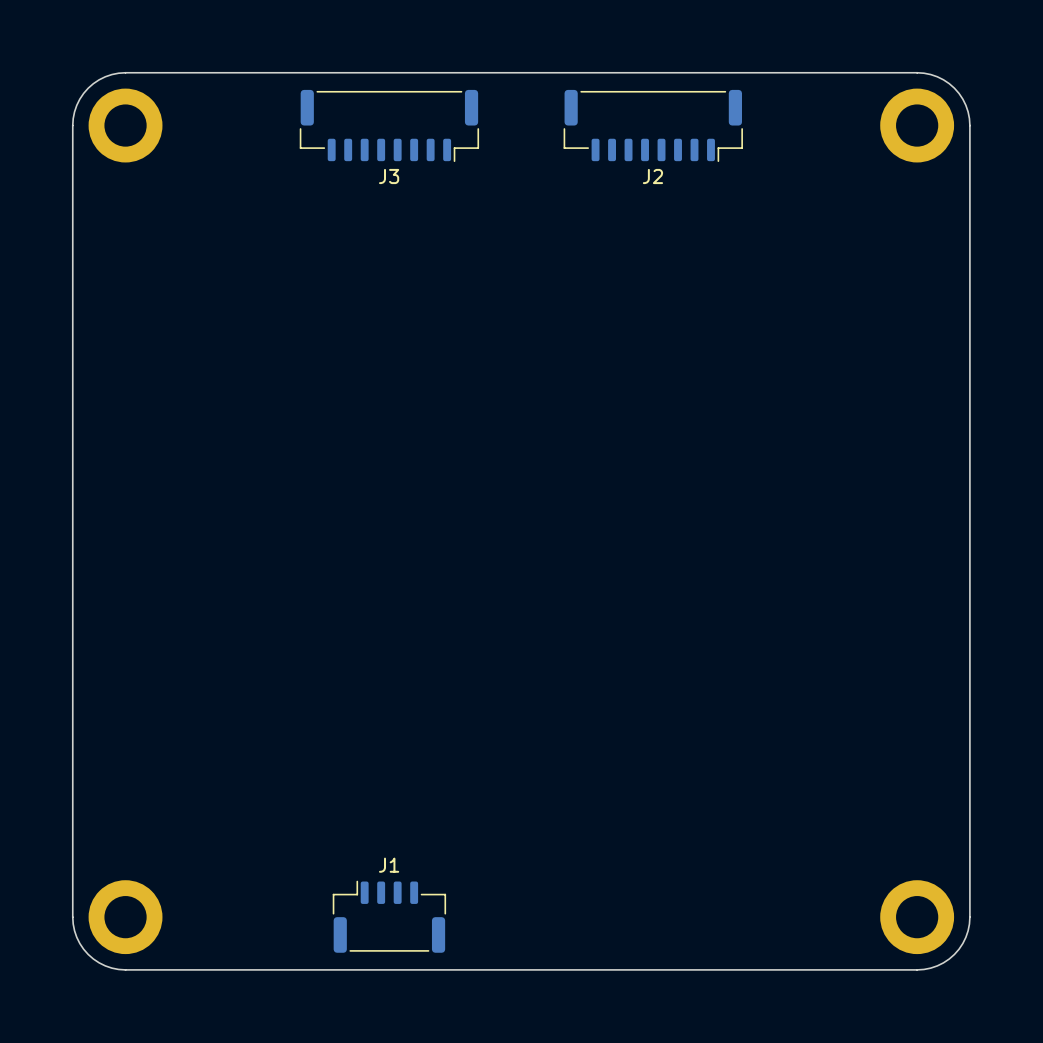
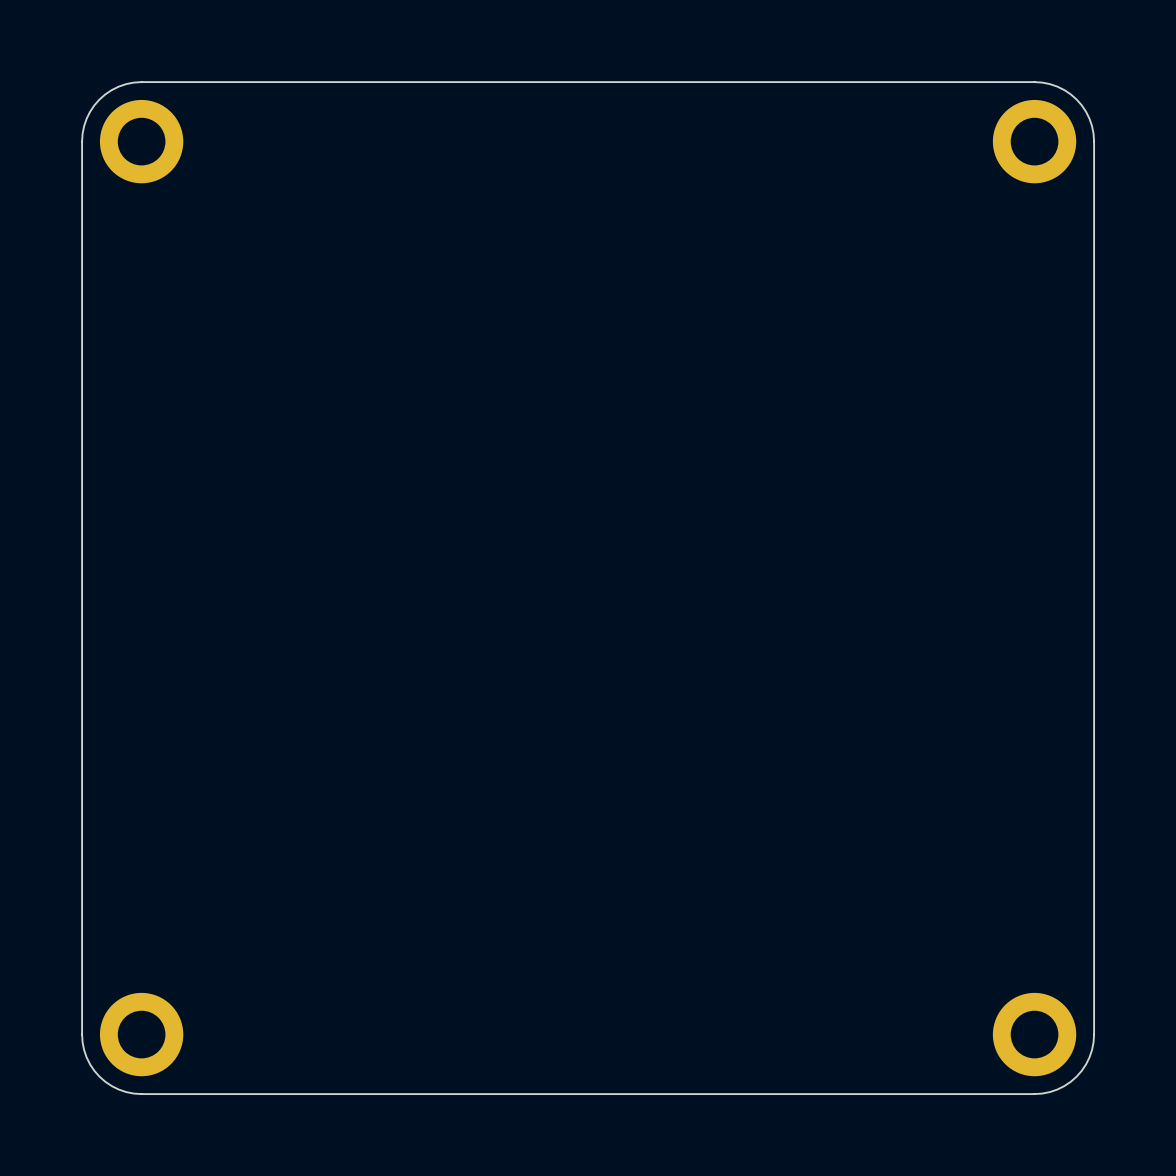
J3: (389, 125) -> none
J2: (653, 125) -> none
J1: (389, 916) -> none

